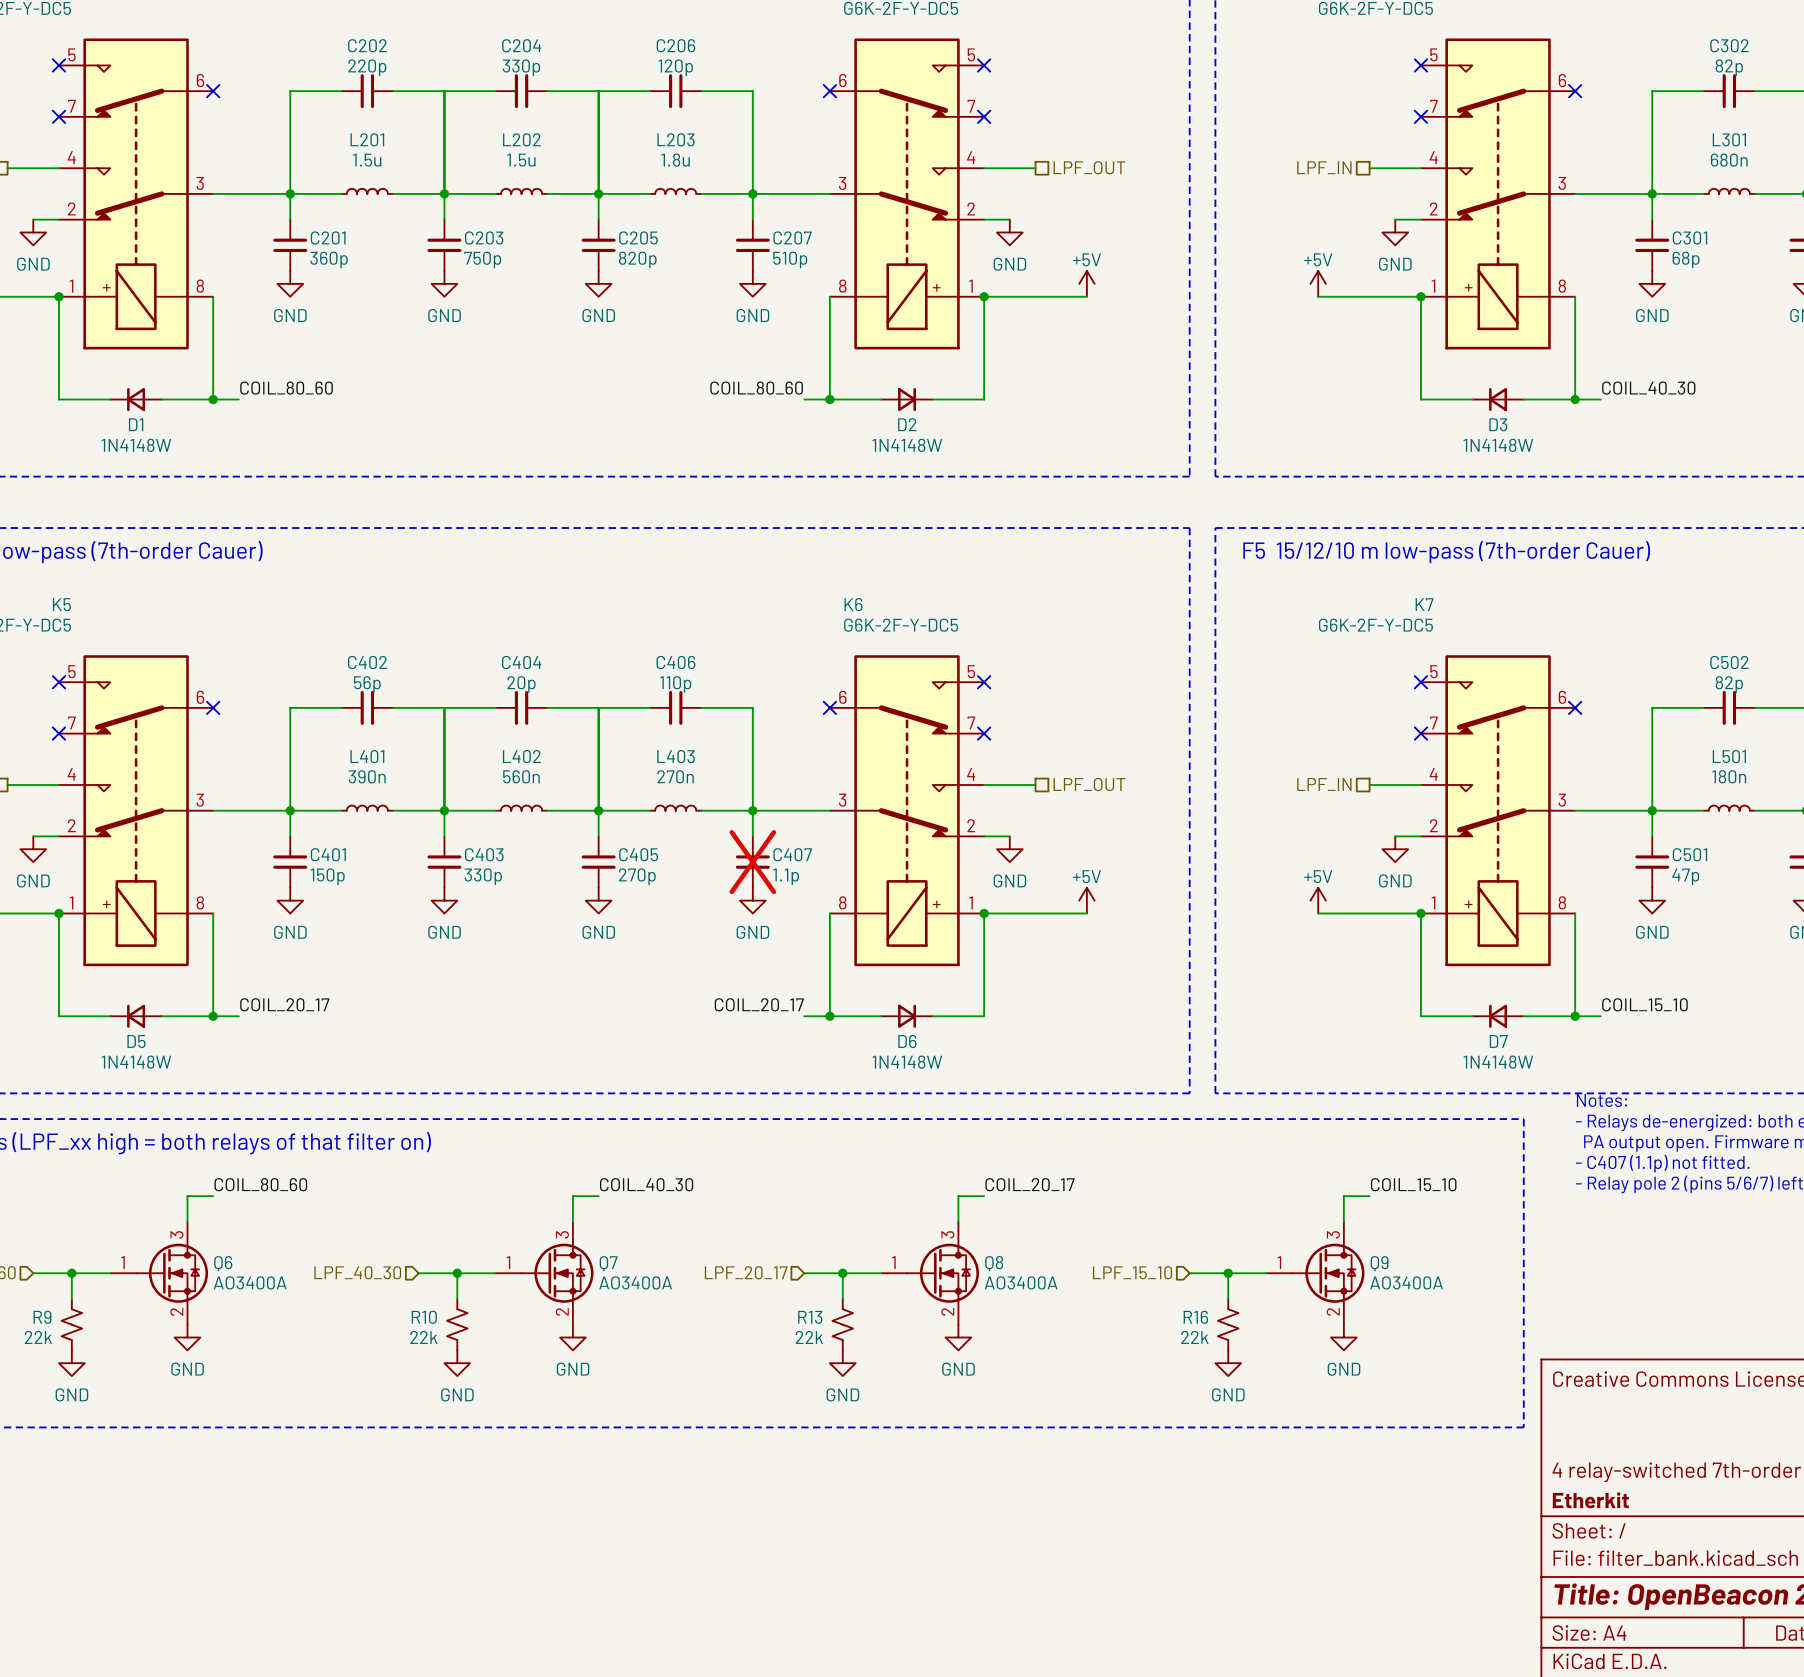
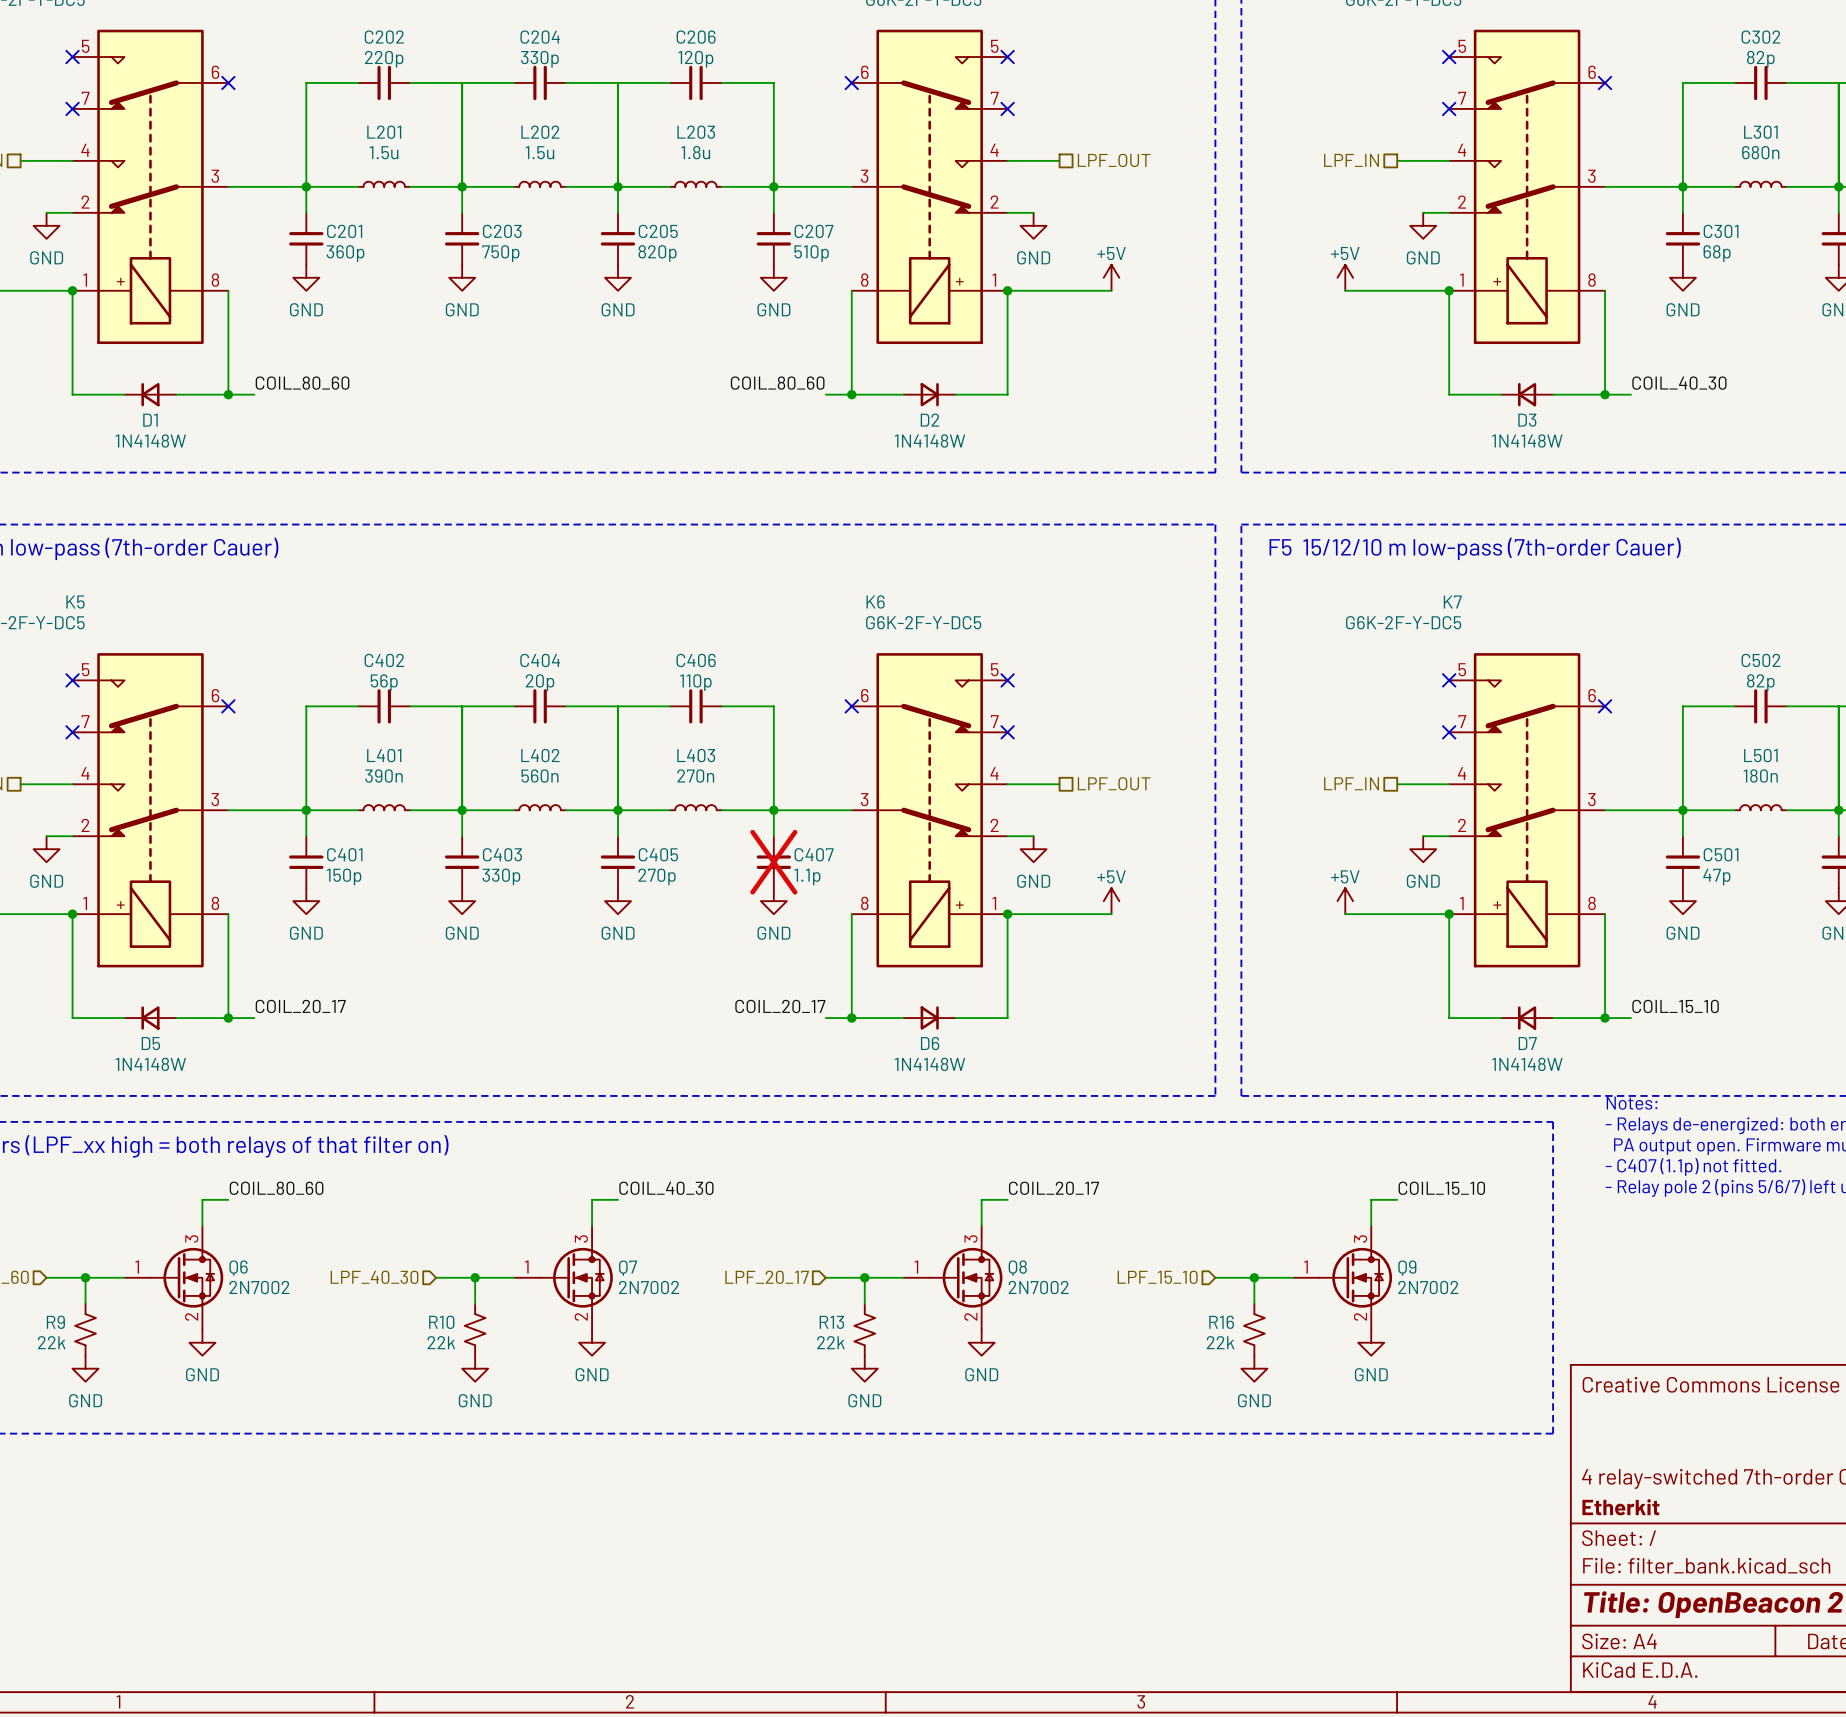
Q6 value: AO3400A (250, 1282) -> 2N7002 (259, 1287)
Q7 value: AO3400A (635, 1282) -> 2N7002 (649, 1287)
Q8 value: AO3400A (1021, 1282) -> 2N7002 (1038, 1287)
Q9 value: AO3400A (1406, 1282) -> 2N7002 (1428, 1287)

